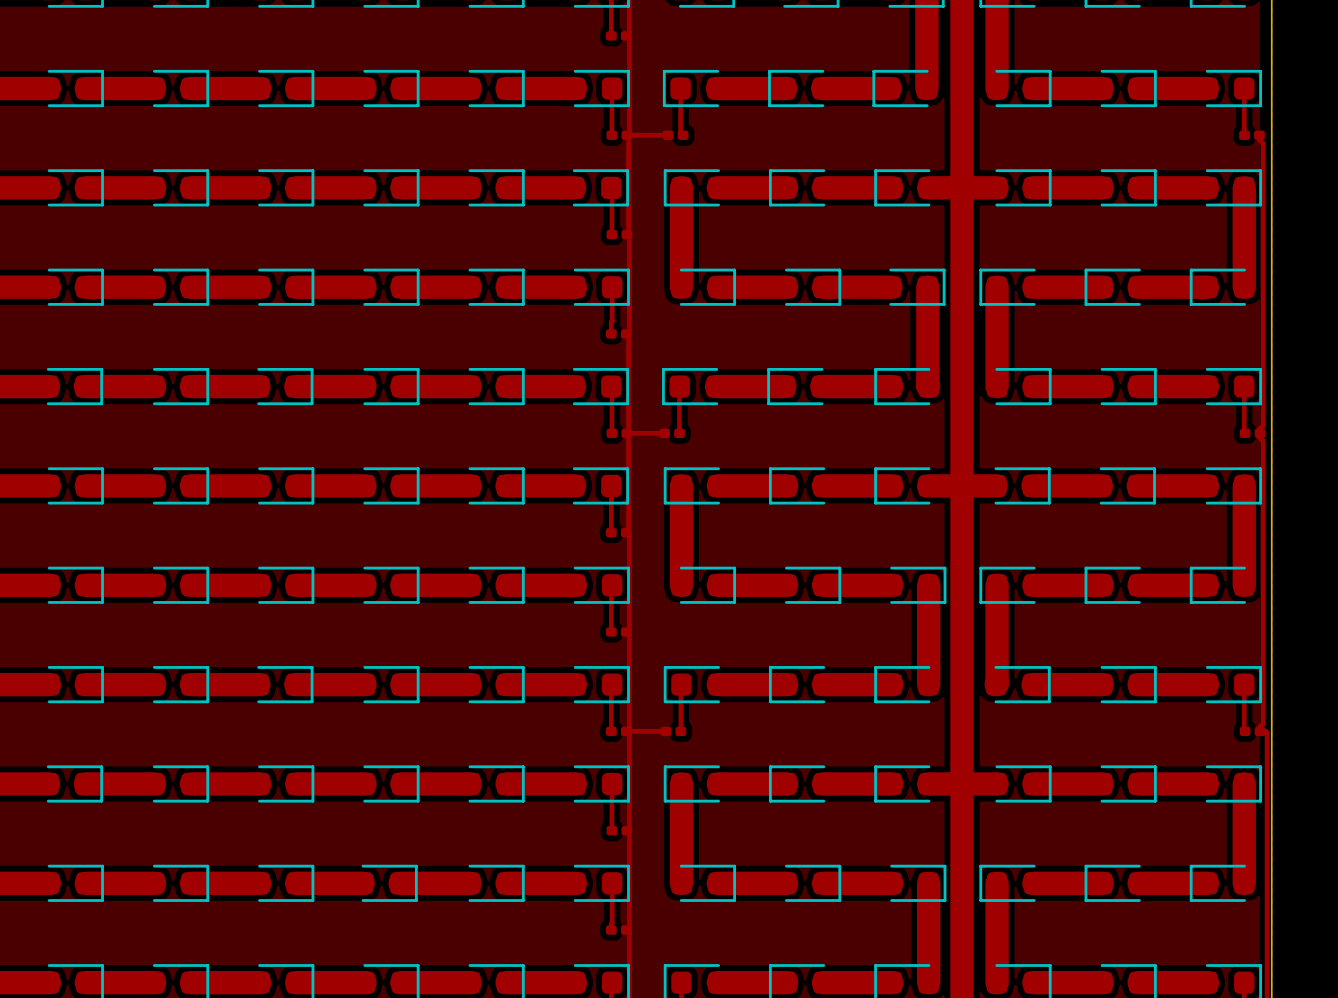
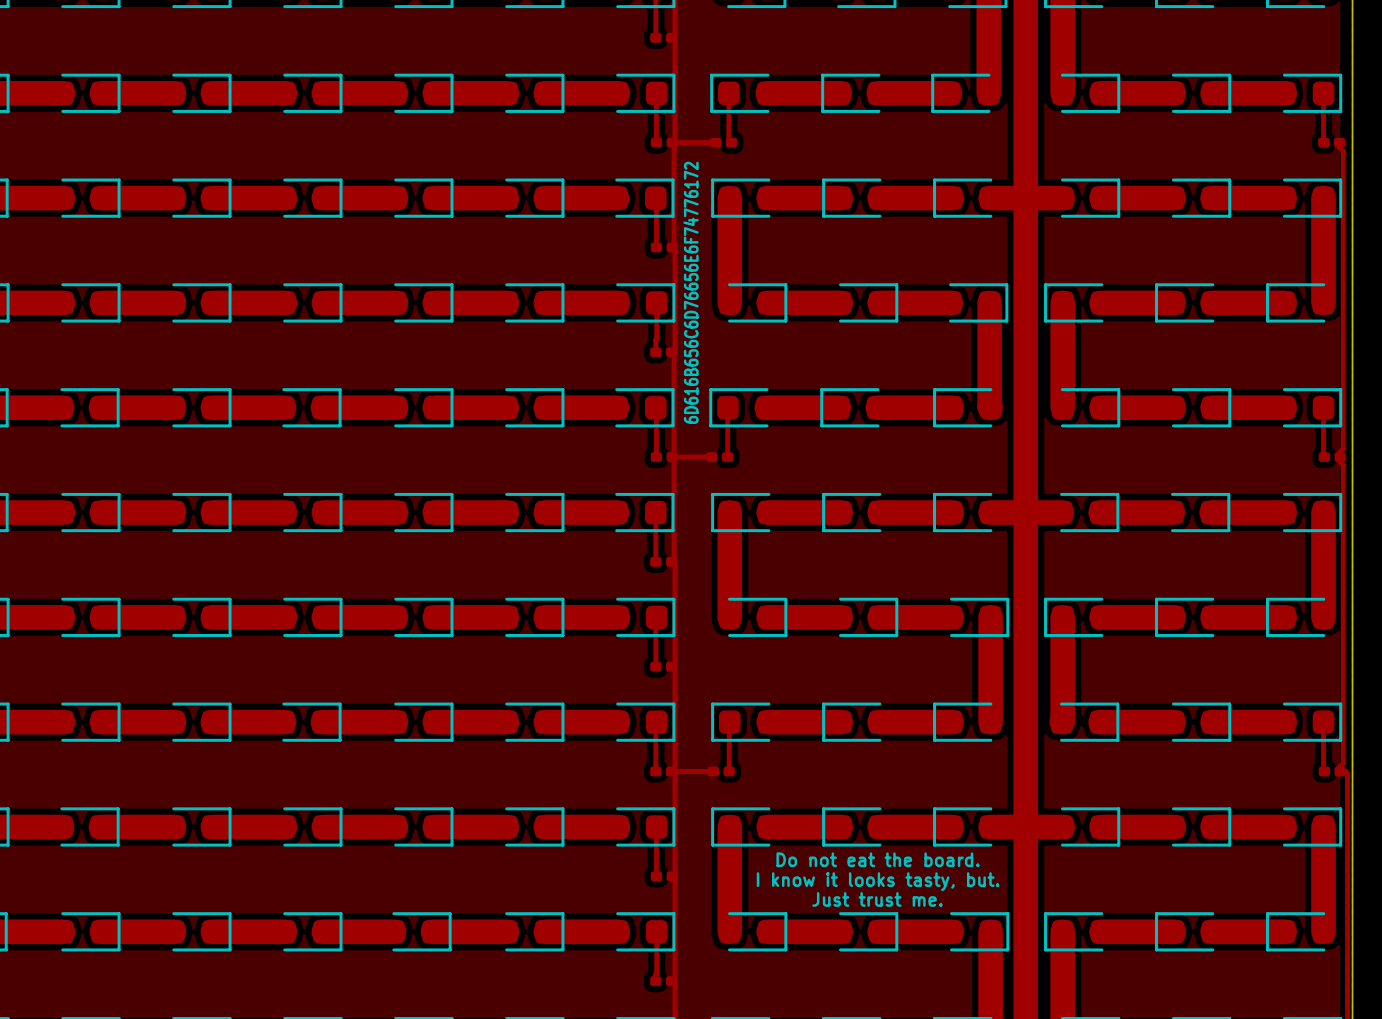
text: none -> 6D616B656C6D76656E6F74776172 (691, 292)
text: none -> Do not eat the board. (878, 859)
text: none -> I know it looks tasty, but. (878, 881)
text: none -> Just trust me. (877, 899)

